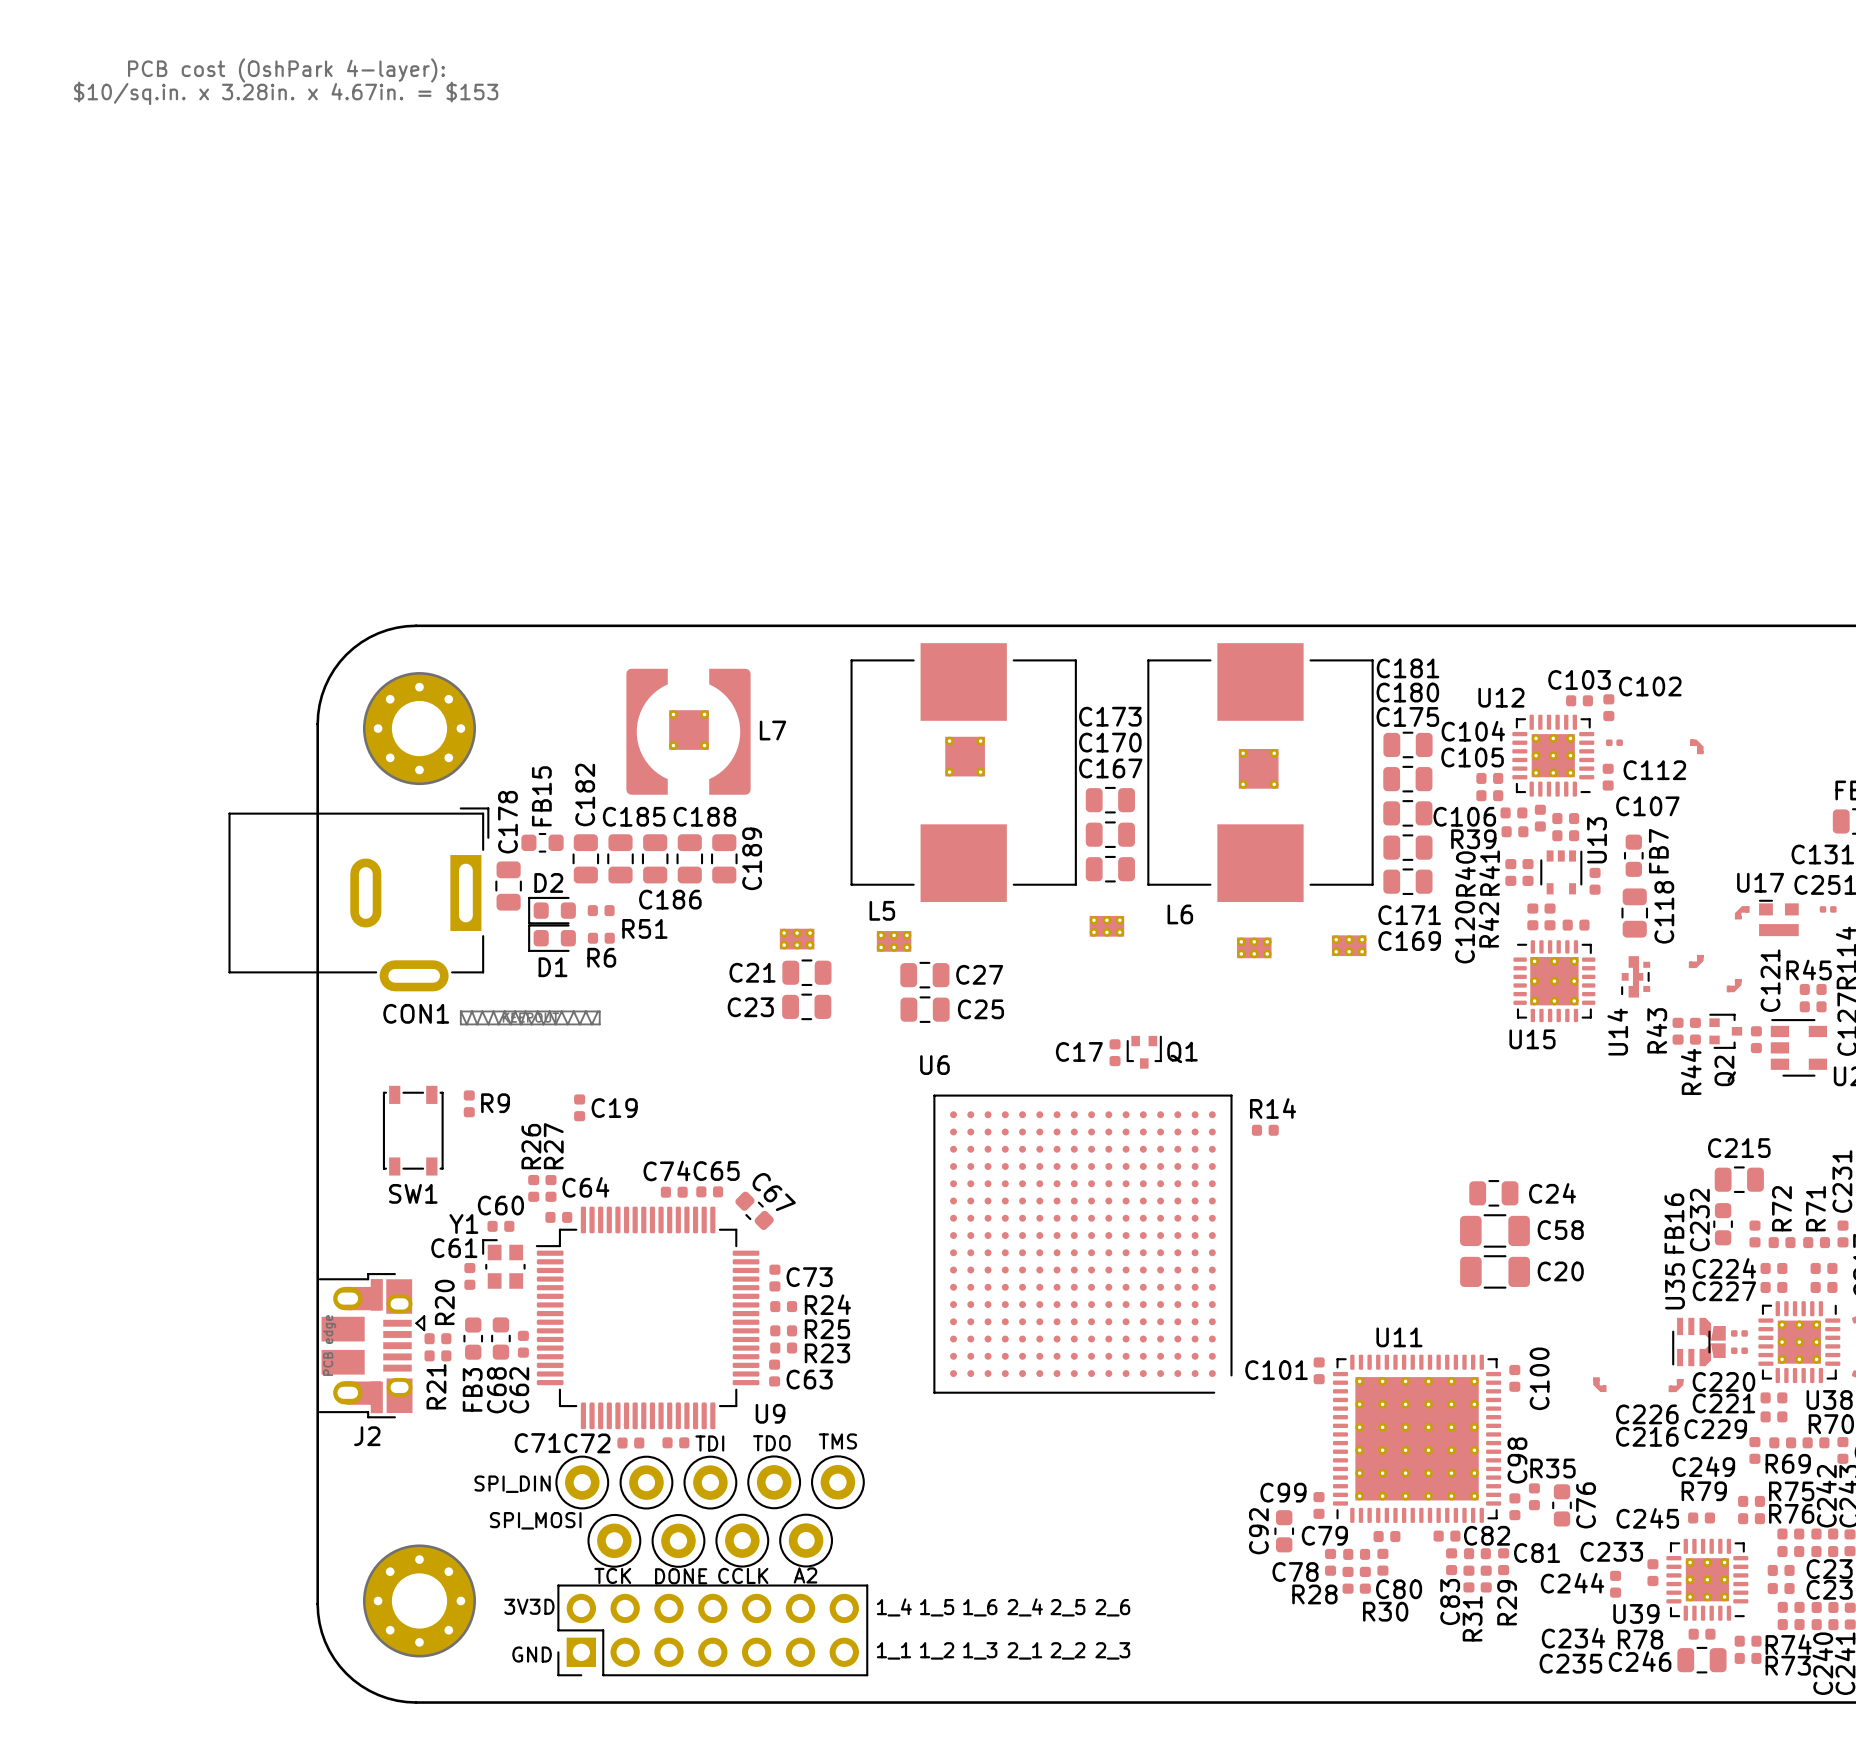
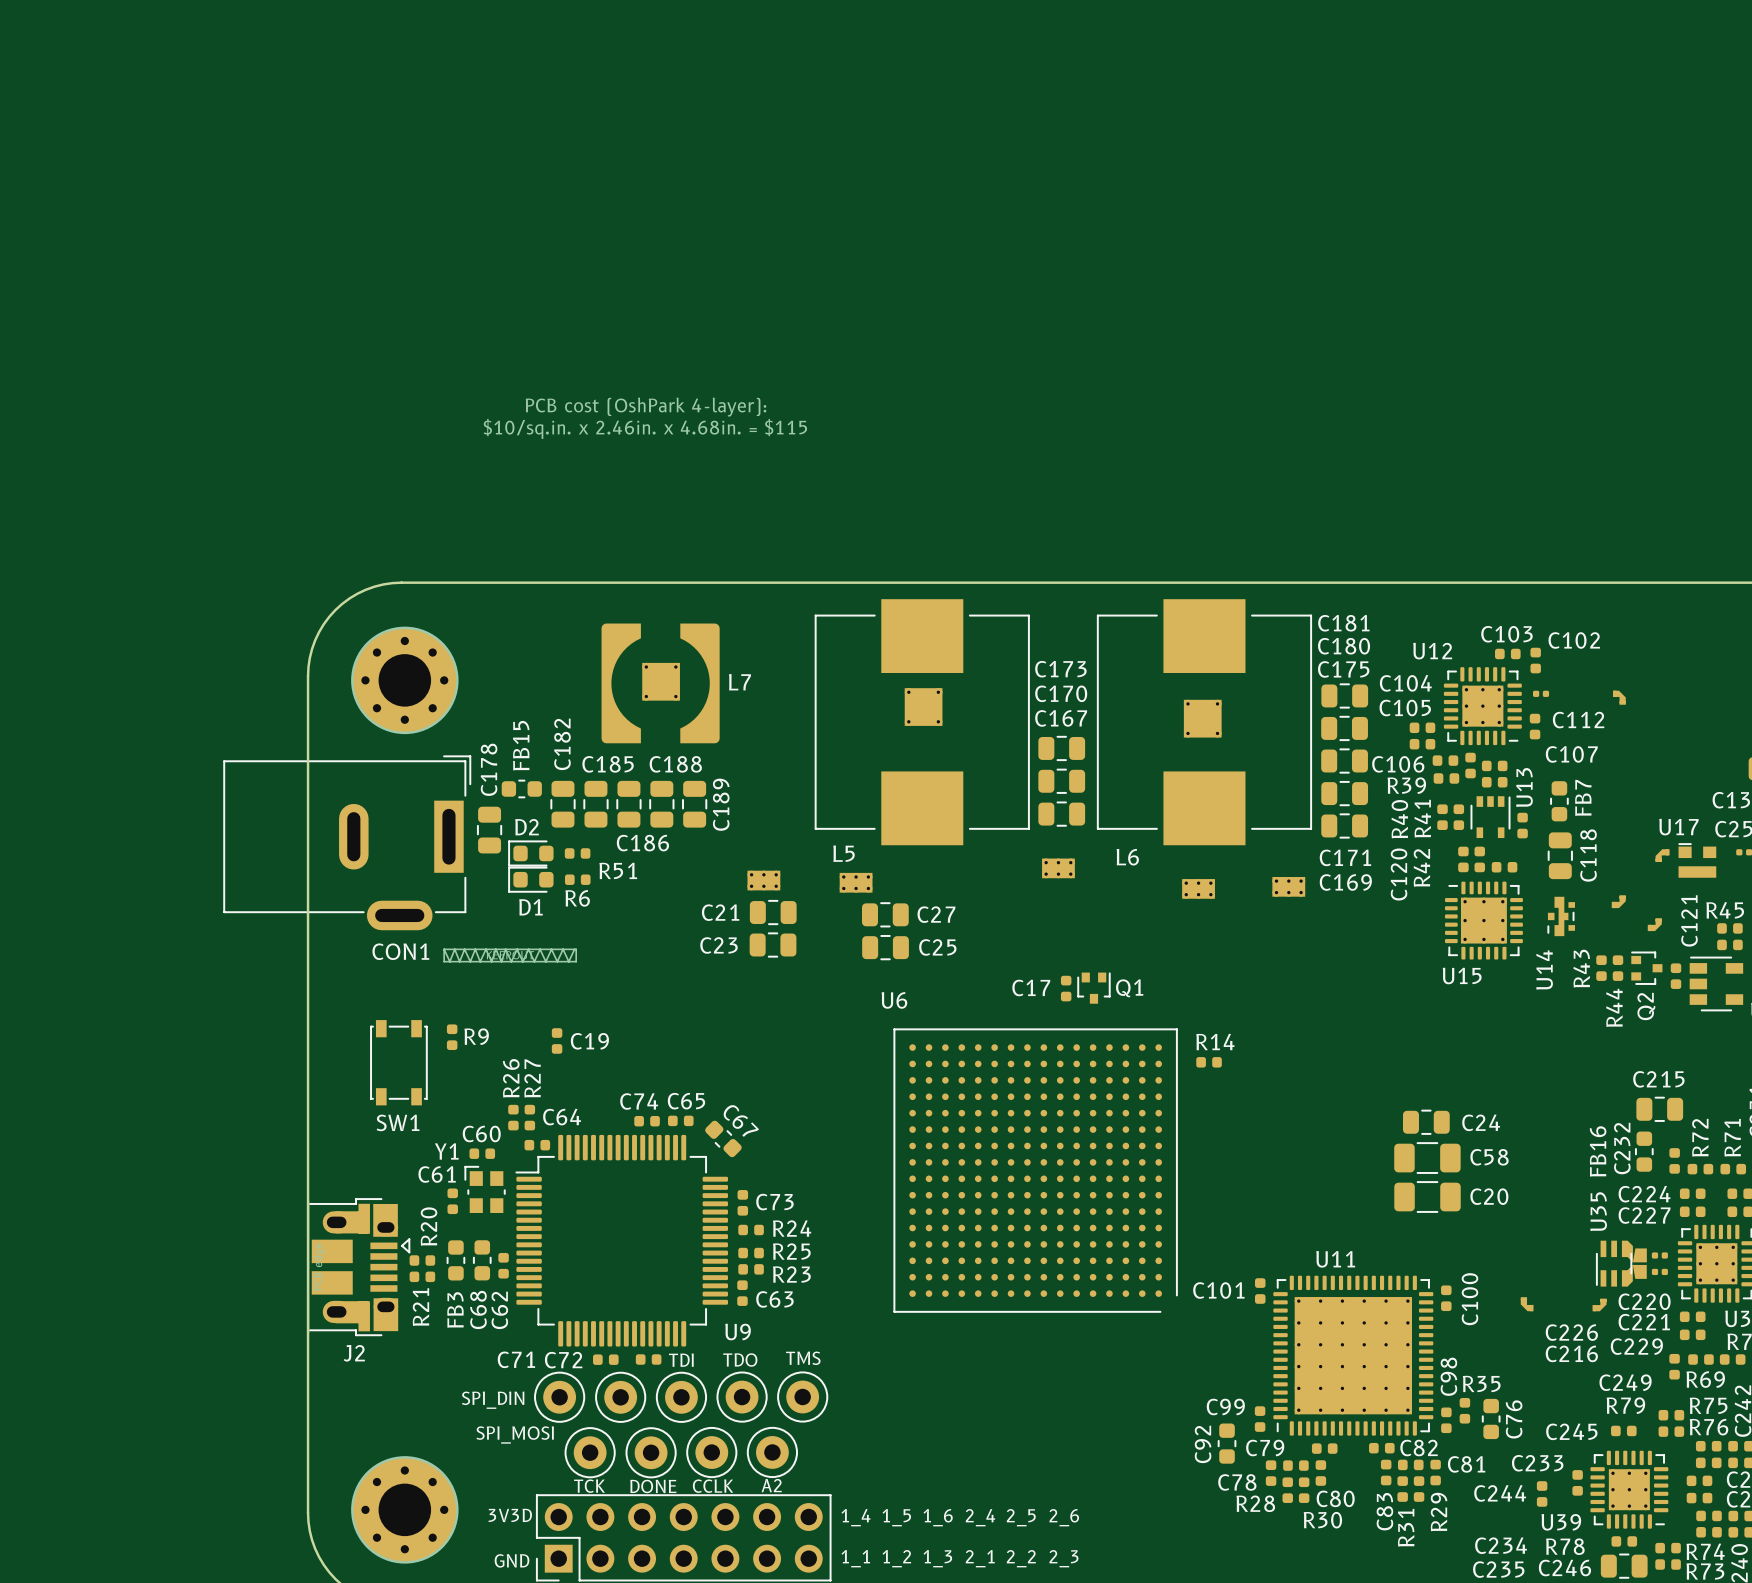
text: PCB cost (OshPark 4-layer): (286, 70) -> none
text: $10/sq.in. x 3.28in. x 4.67in. = $153 (286, 93) -> none
text: none -> PCB cost (OshPark 4-layer): (646, 407)
text: none -> $10/sq.in. x 2.46in. x 4.68in. = $115 (645, 428)

